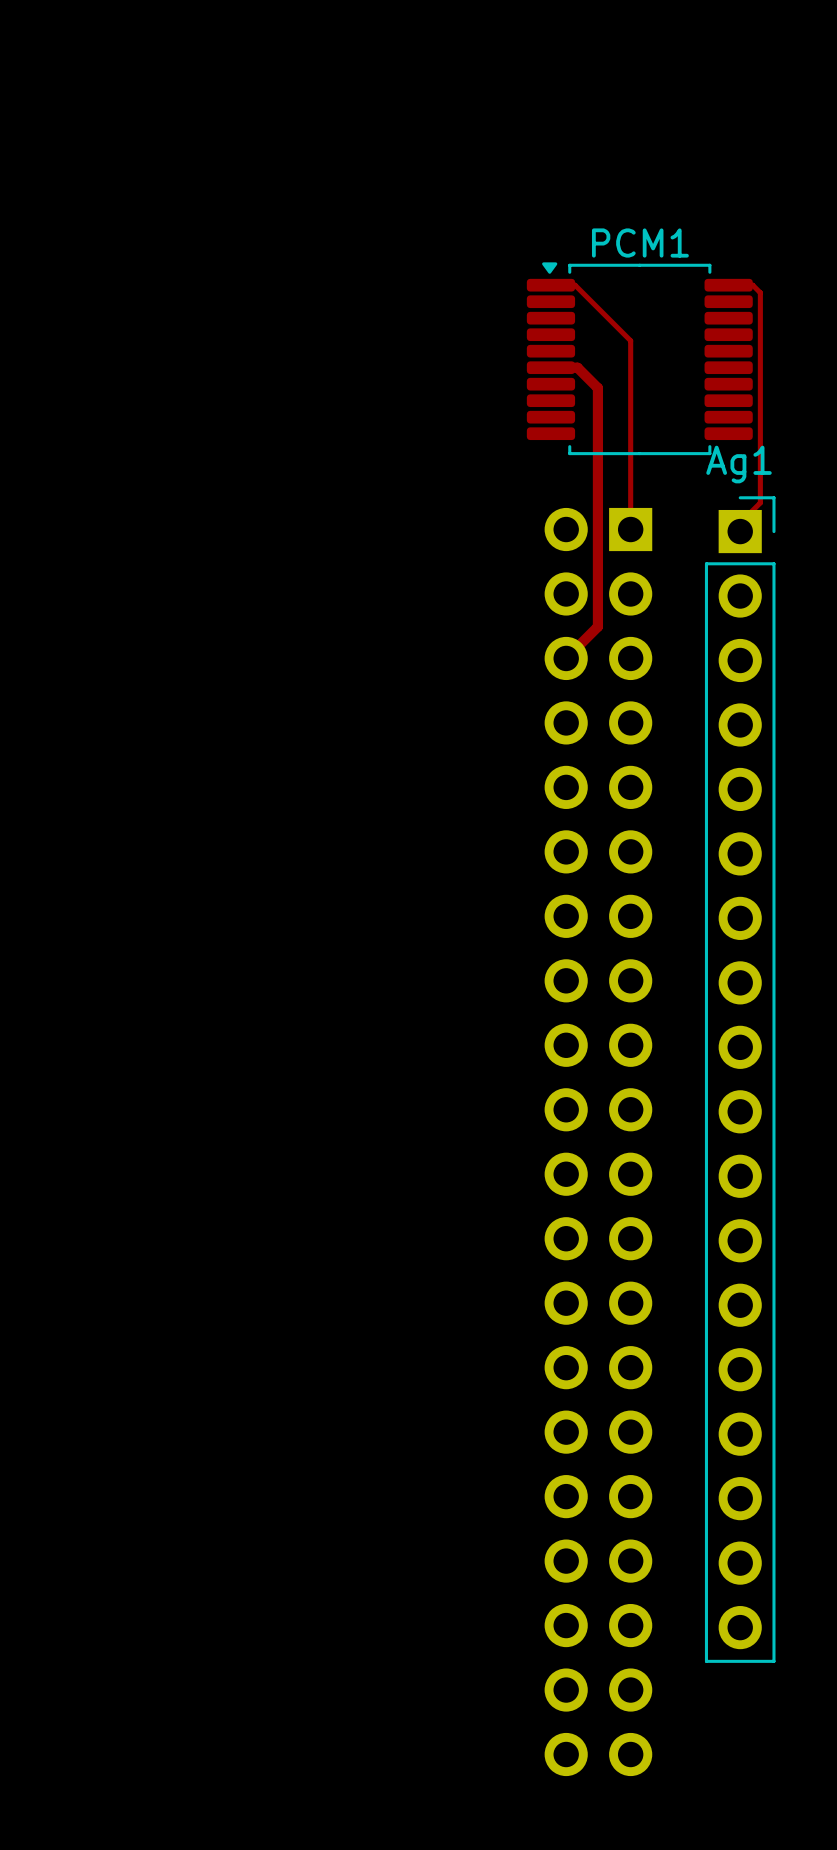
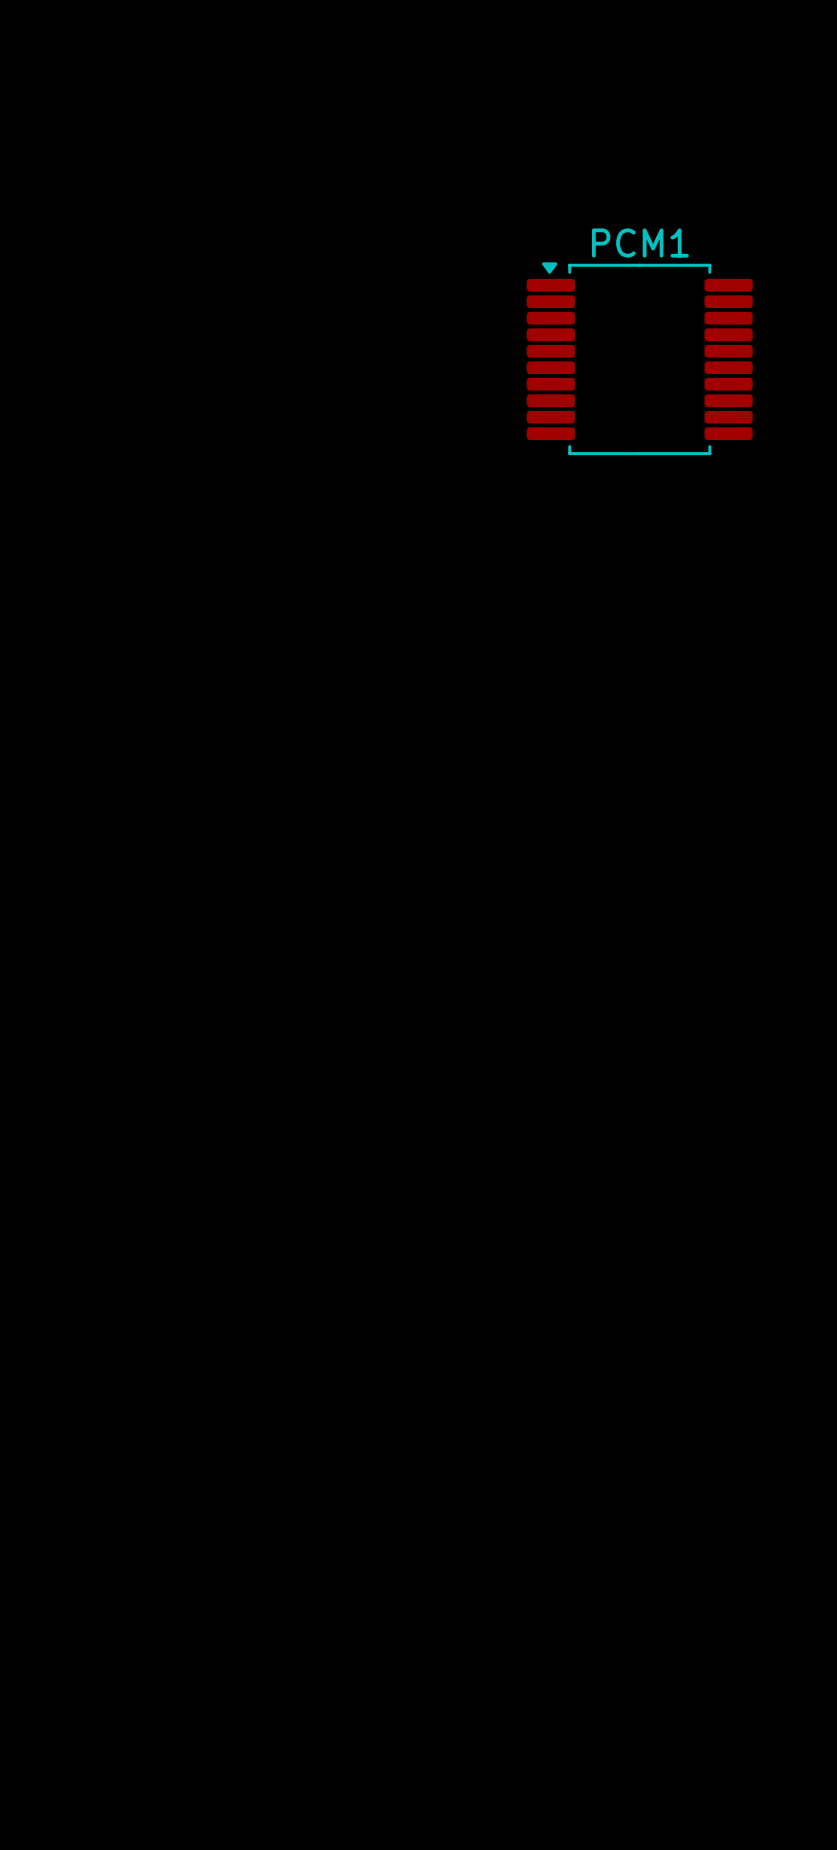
top track: (550, 285) (575, 285) (630, 340) (630, 529) -> none
top track: (728, 285) (752, 285) (760, 292) (760, 502) (741, 521) -> none
top track: (550, 367) (577, 367) (597, 388) (597, 626) (566, 658) -> none
Ag1: (740, 1079) -> none
part: (598, 1142) -> none

